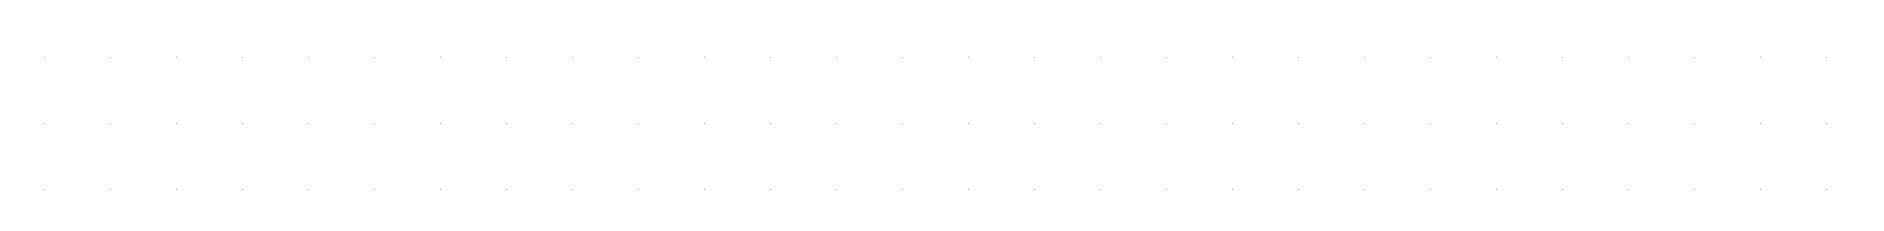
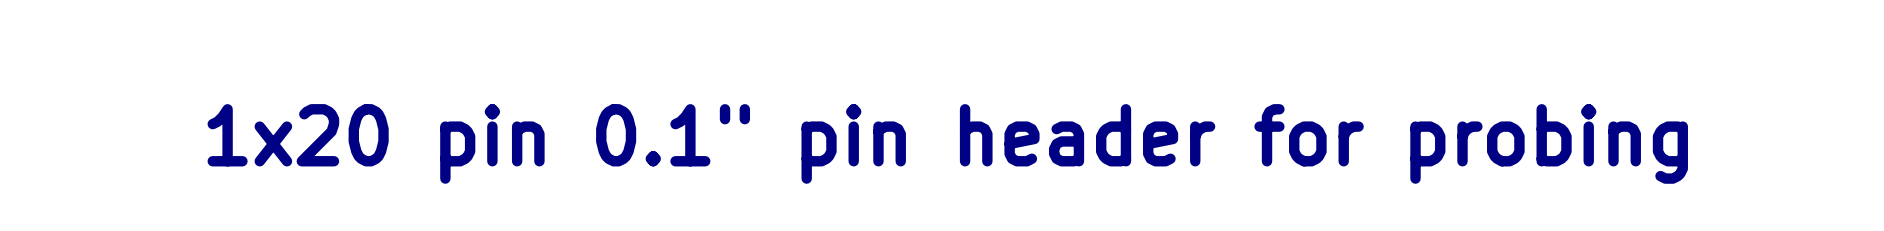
text: none -> 1x20 pin 0.1" pin header for probing (947, 143)

